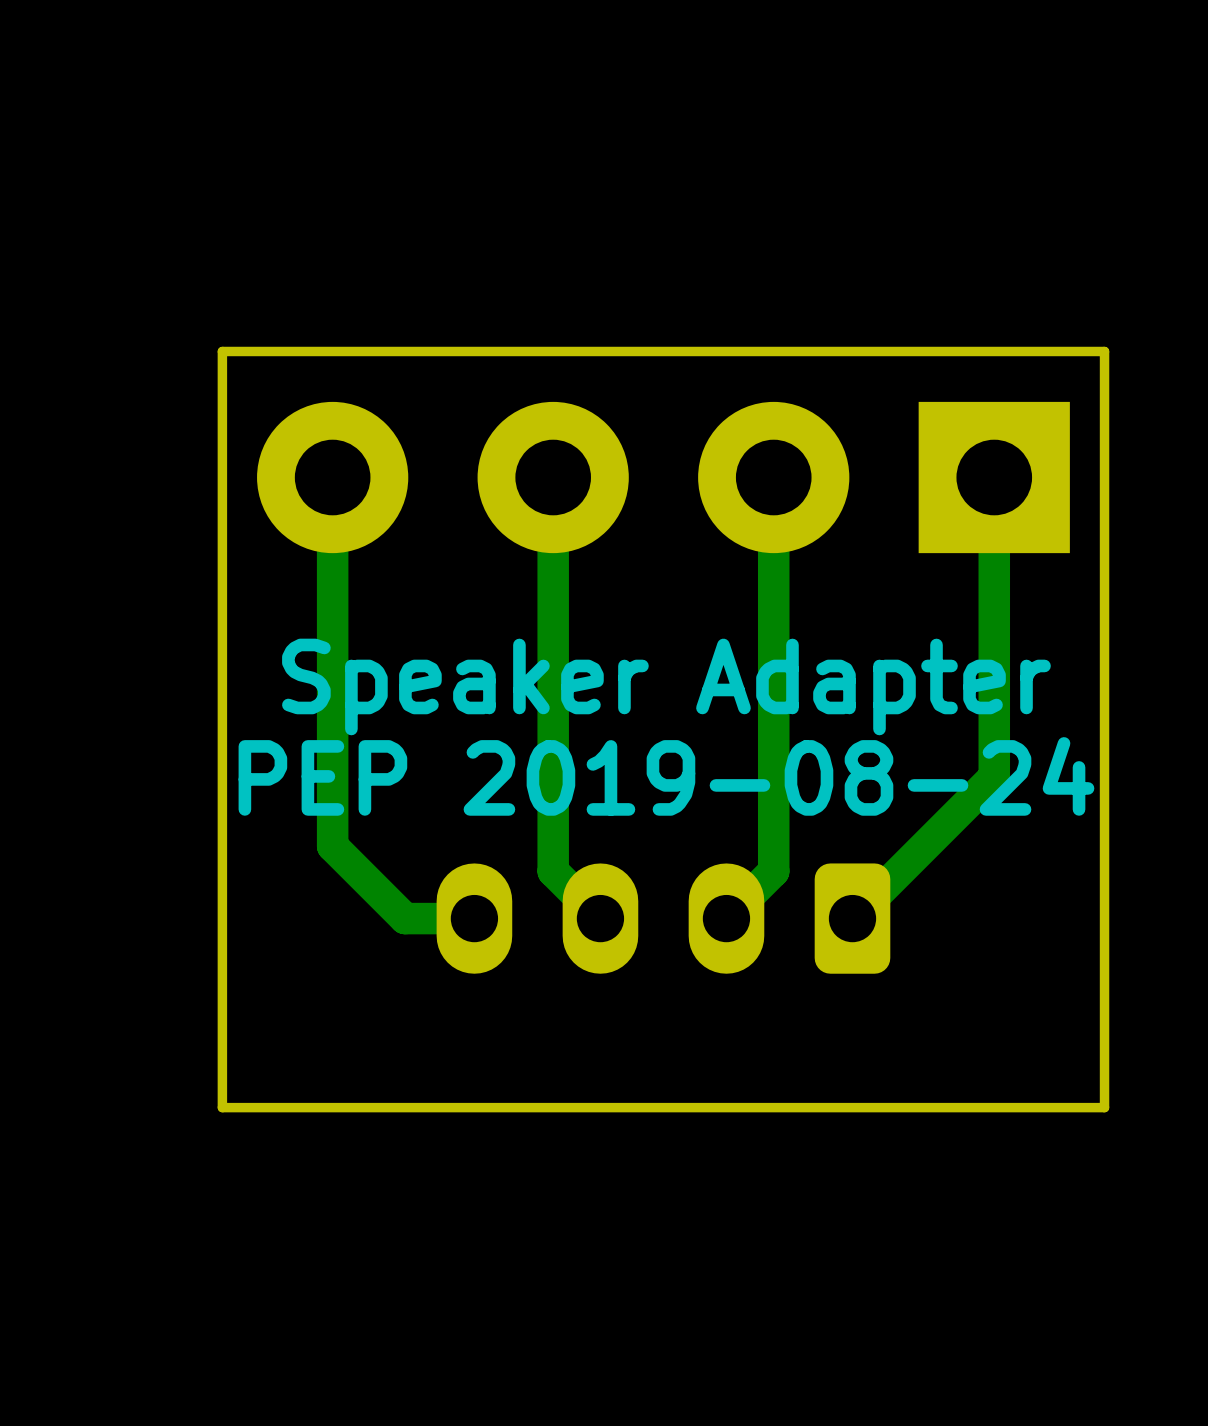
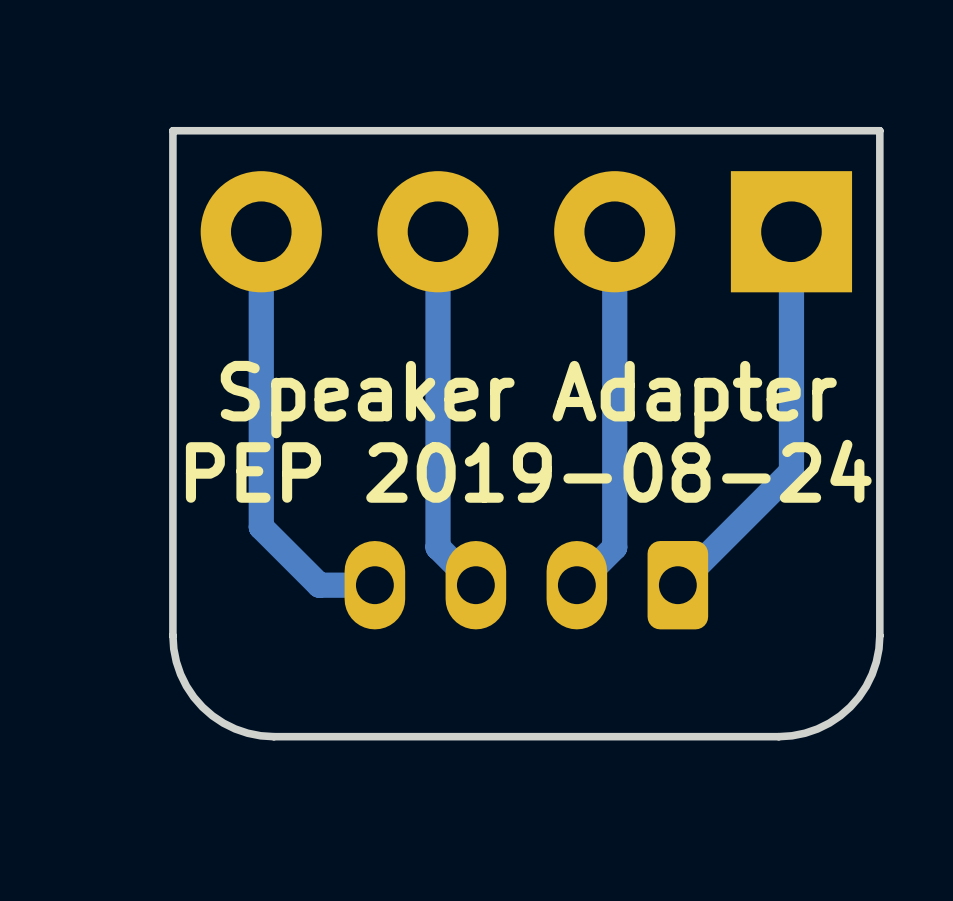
board edge: (222, 981) (222, 1107) (348, 1107) -> (172, 635) (173, 648) (180, 674) (193, 697) (202, 707) (223, 723) (235, 728) (247, 733) (273, 736)
board edge: (1104, 981) (1104, 1107) (978, 1107) -> (879, 635) (878, 648) (872, 674) (858, 697) (850, 707) (829, 723) (817, 728) (804, 733) (778, 736)

